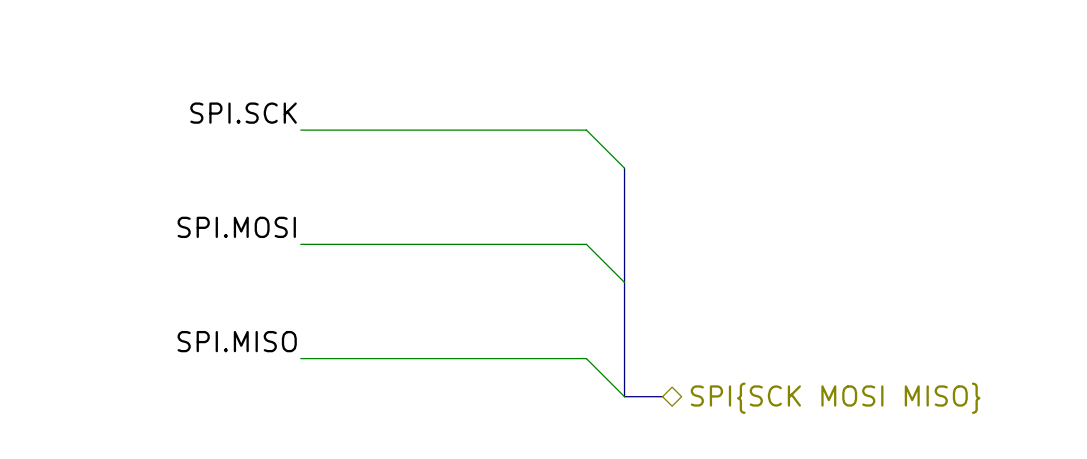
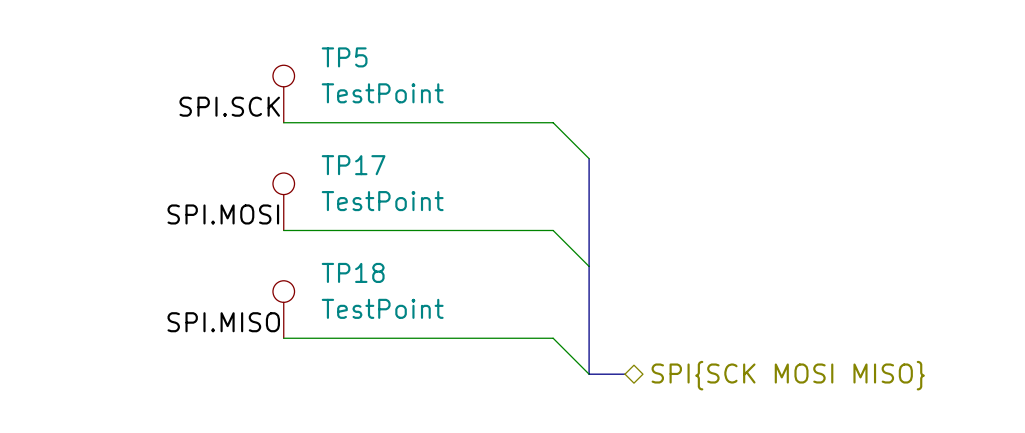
TP5: none -> TestPoint (283, 93)
TP17: none -> TestPoint (283, 201)
TP18: none -> TestPoint (283, 309)

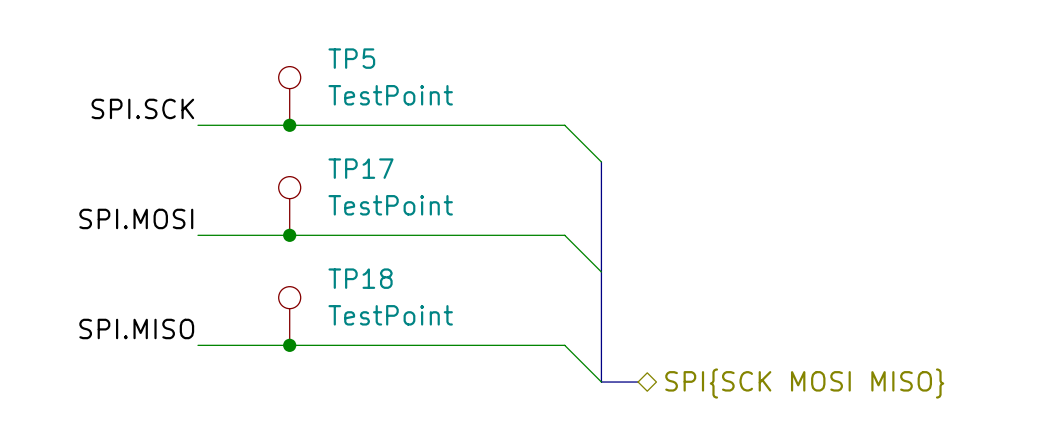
label position: SPI.SCK (229, 106) -> SPI.SCK (142, 108)
wire: none -> (198, 125) (289, 125)
junction: none -> (289, 125)
label position: SPI.MOSI (223, 214) -> SPI.MOSI (136, 218)
wire: none -> (198, 235) (289, 235)
junction: none -> (289, 235)
label position: SPI.MISO (223, 322) -> SPI.MISO (136, 328)
wire: none -> (198, 345) (289, 345)
junction: none -> (289, 345)

